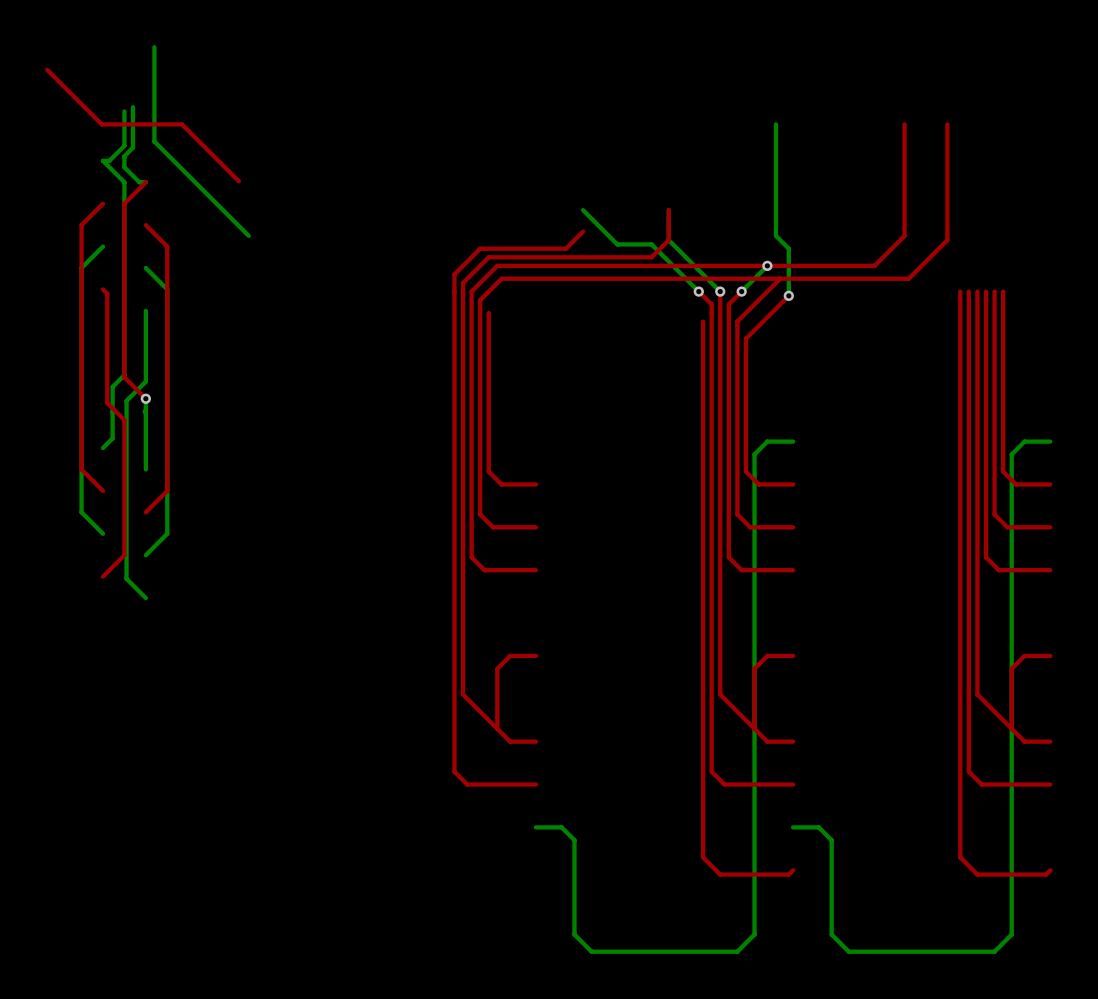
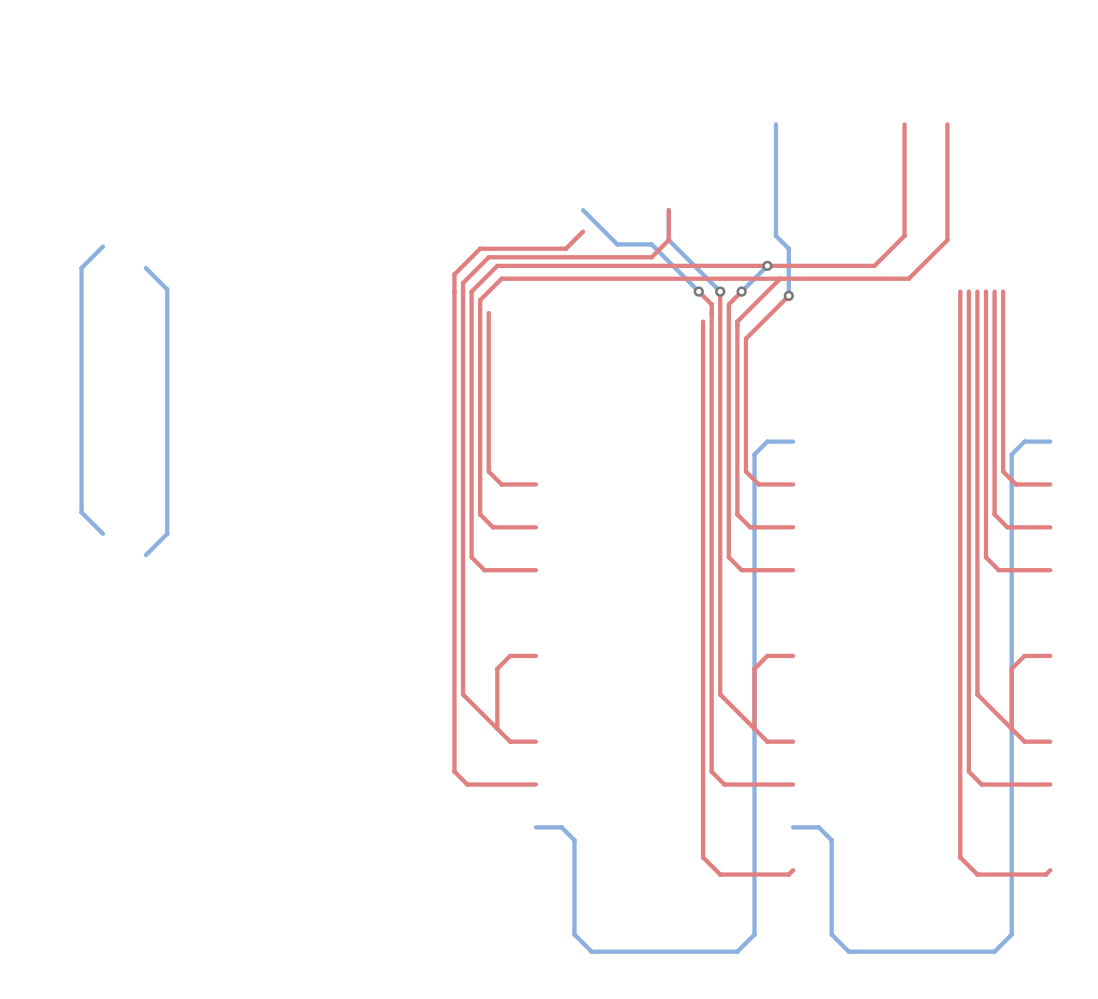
bottom track: (154, 47) (154, 141) (248, 235) -> none
top track: (47, 69) (101, 124) (182, 124) (238, 181) -> none
bottom track: (132, 107) (132, 147) (124, 156) (124, 167) (139, 182) (145, 182) -> none
bottom track: (124, 111) (124, 145) (109, 160) (102, 160) (124, 182) (124, 375) (112, 386) (112, 438) (102, 448) -> none
top track: (145, 182) (124, 203) (124, 377) (145, 398) -> none
top track: (102, 203) (81, 225) (81, 469) (102, 490) -> none
top track: (145, 225) (167, 246) (167, 490) (145, 512) -> none
top track: (102, 289) (107, 293) (107, 403) (124, 420) (124, 555) (102, 576) -> none
bottom track: (145, 310) (145, 381) (126, 400) (126, 578) (145, 598) -> none
bottom track: (145, 398) (145, 469) -> none
via: (145, 398) -> none

